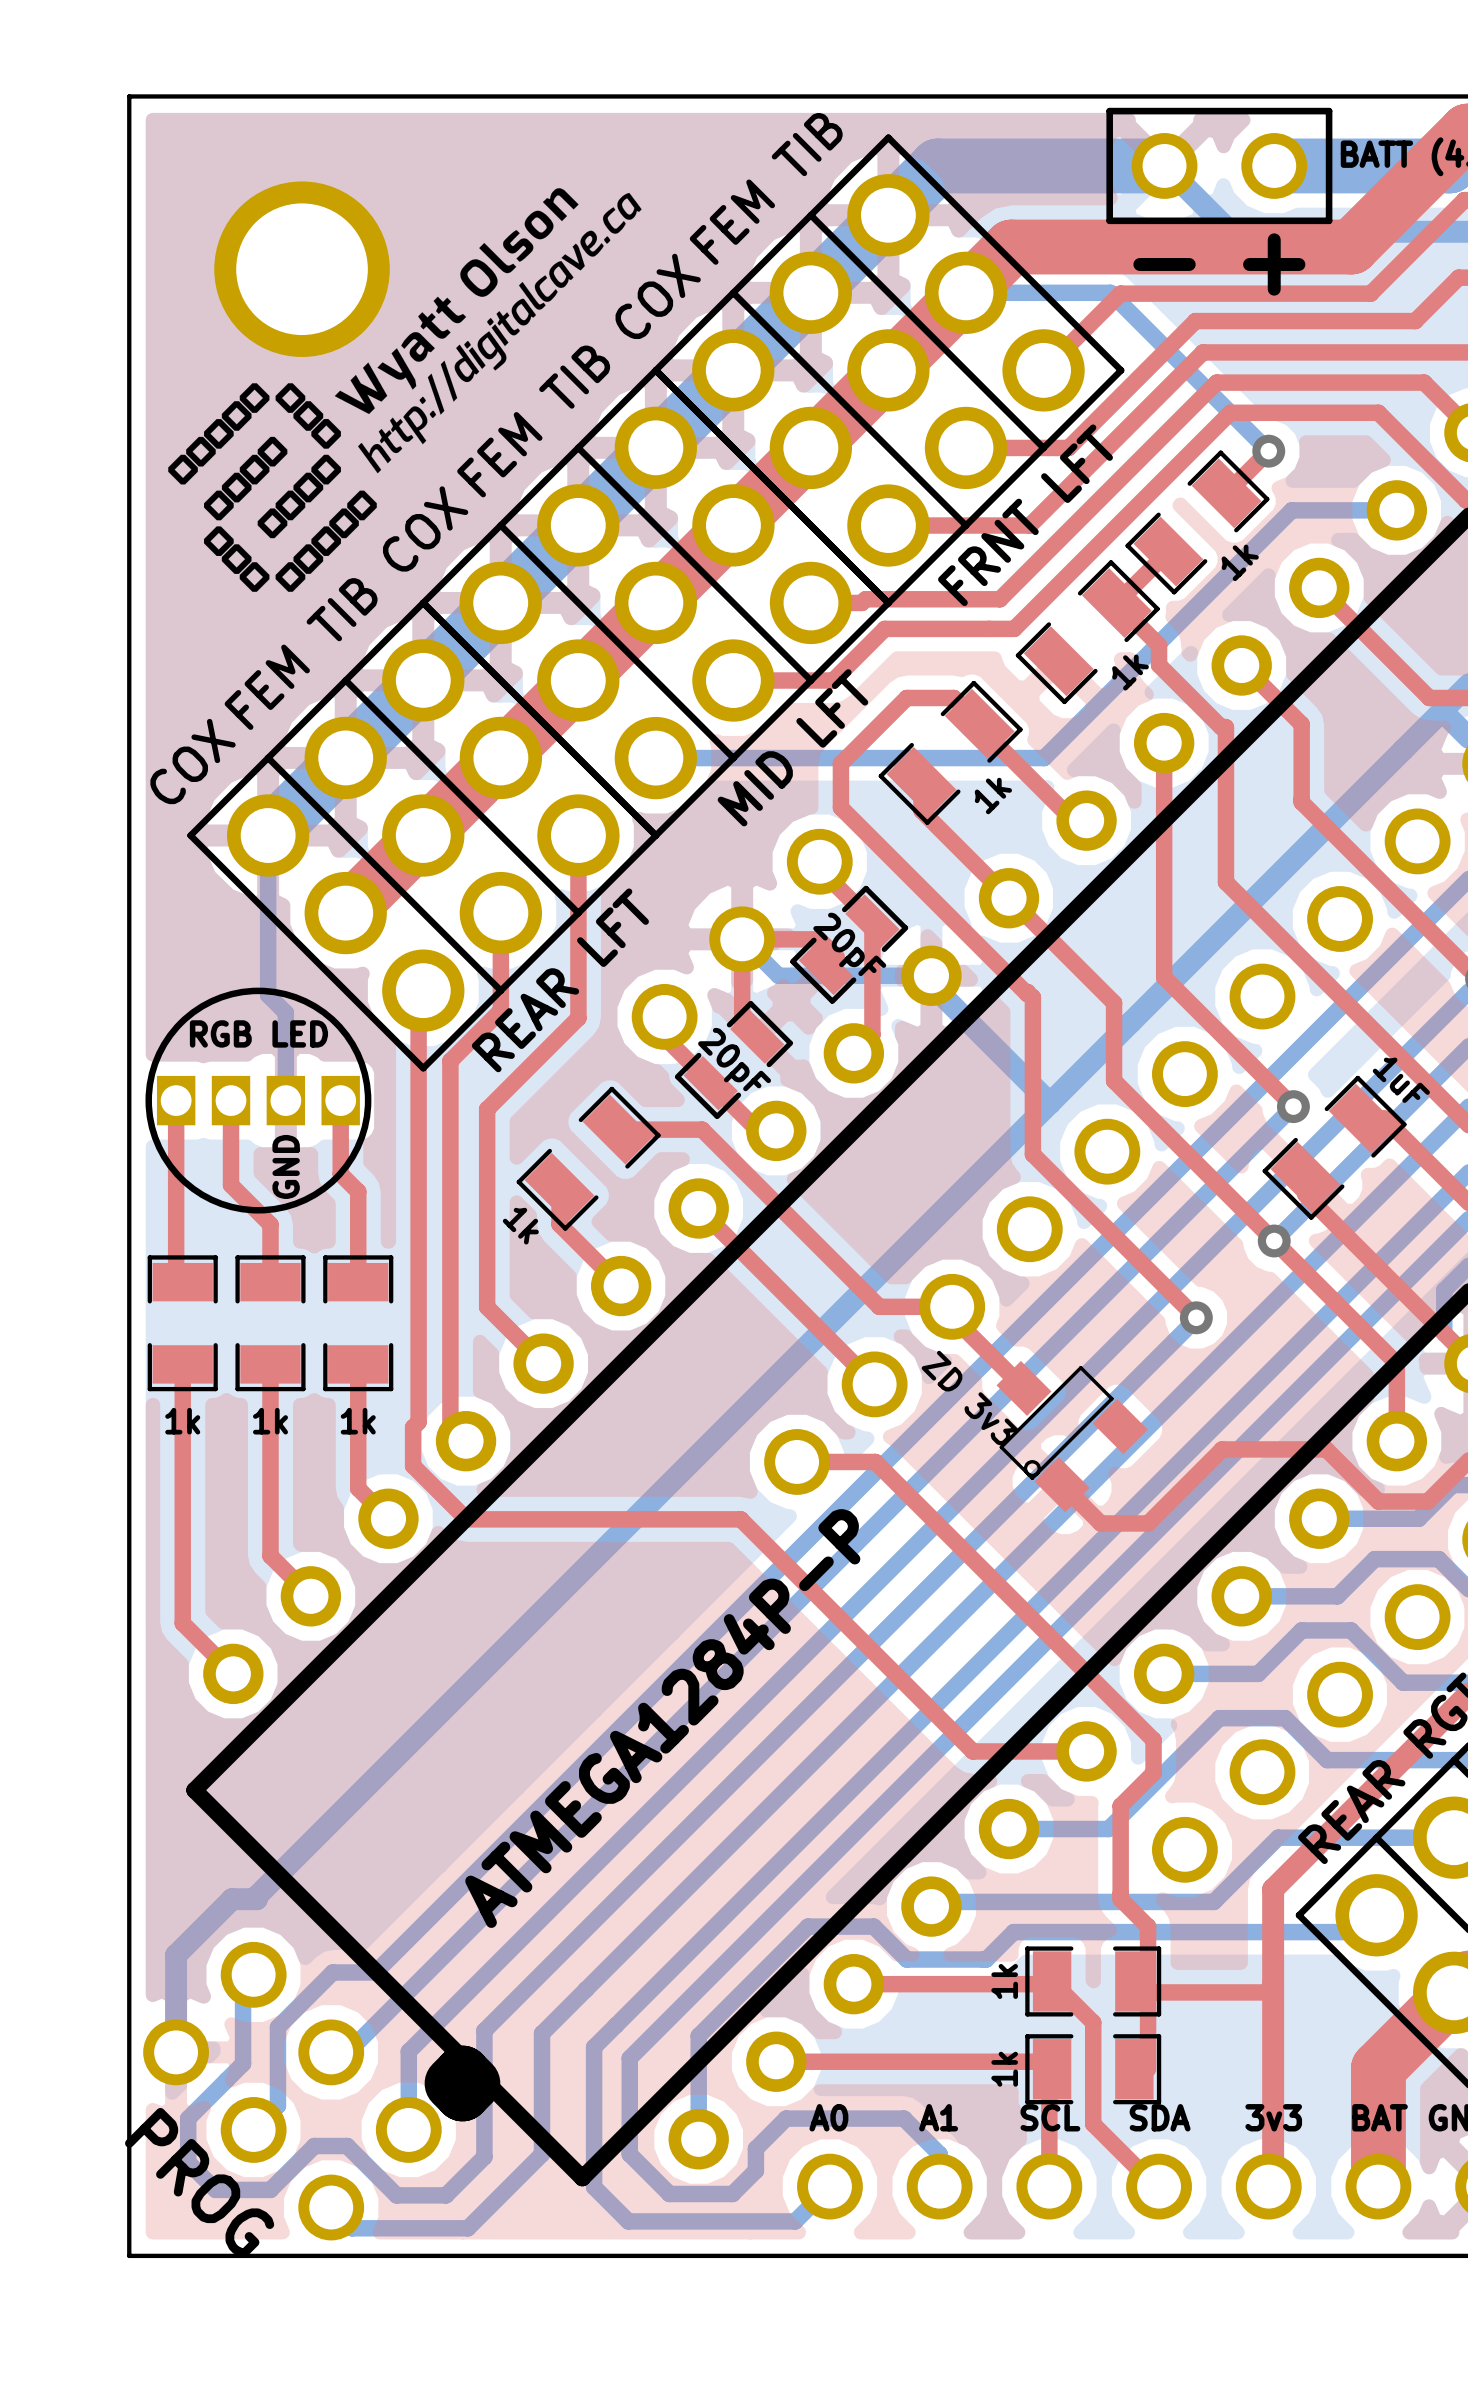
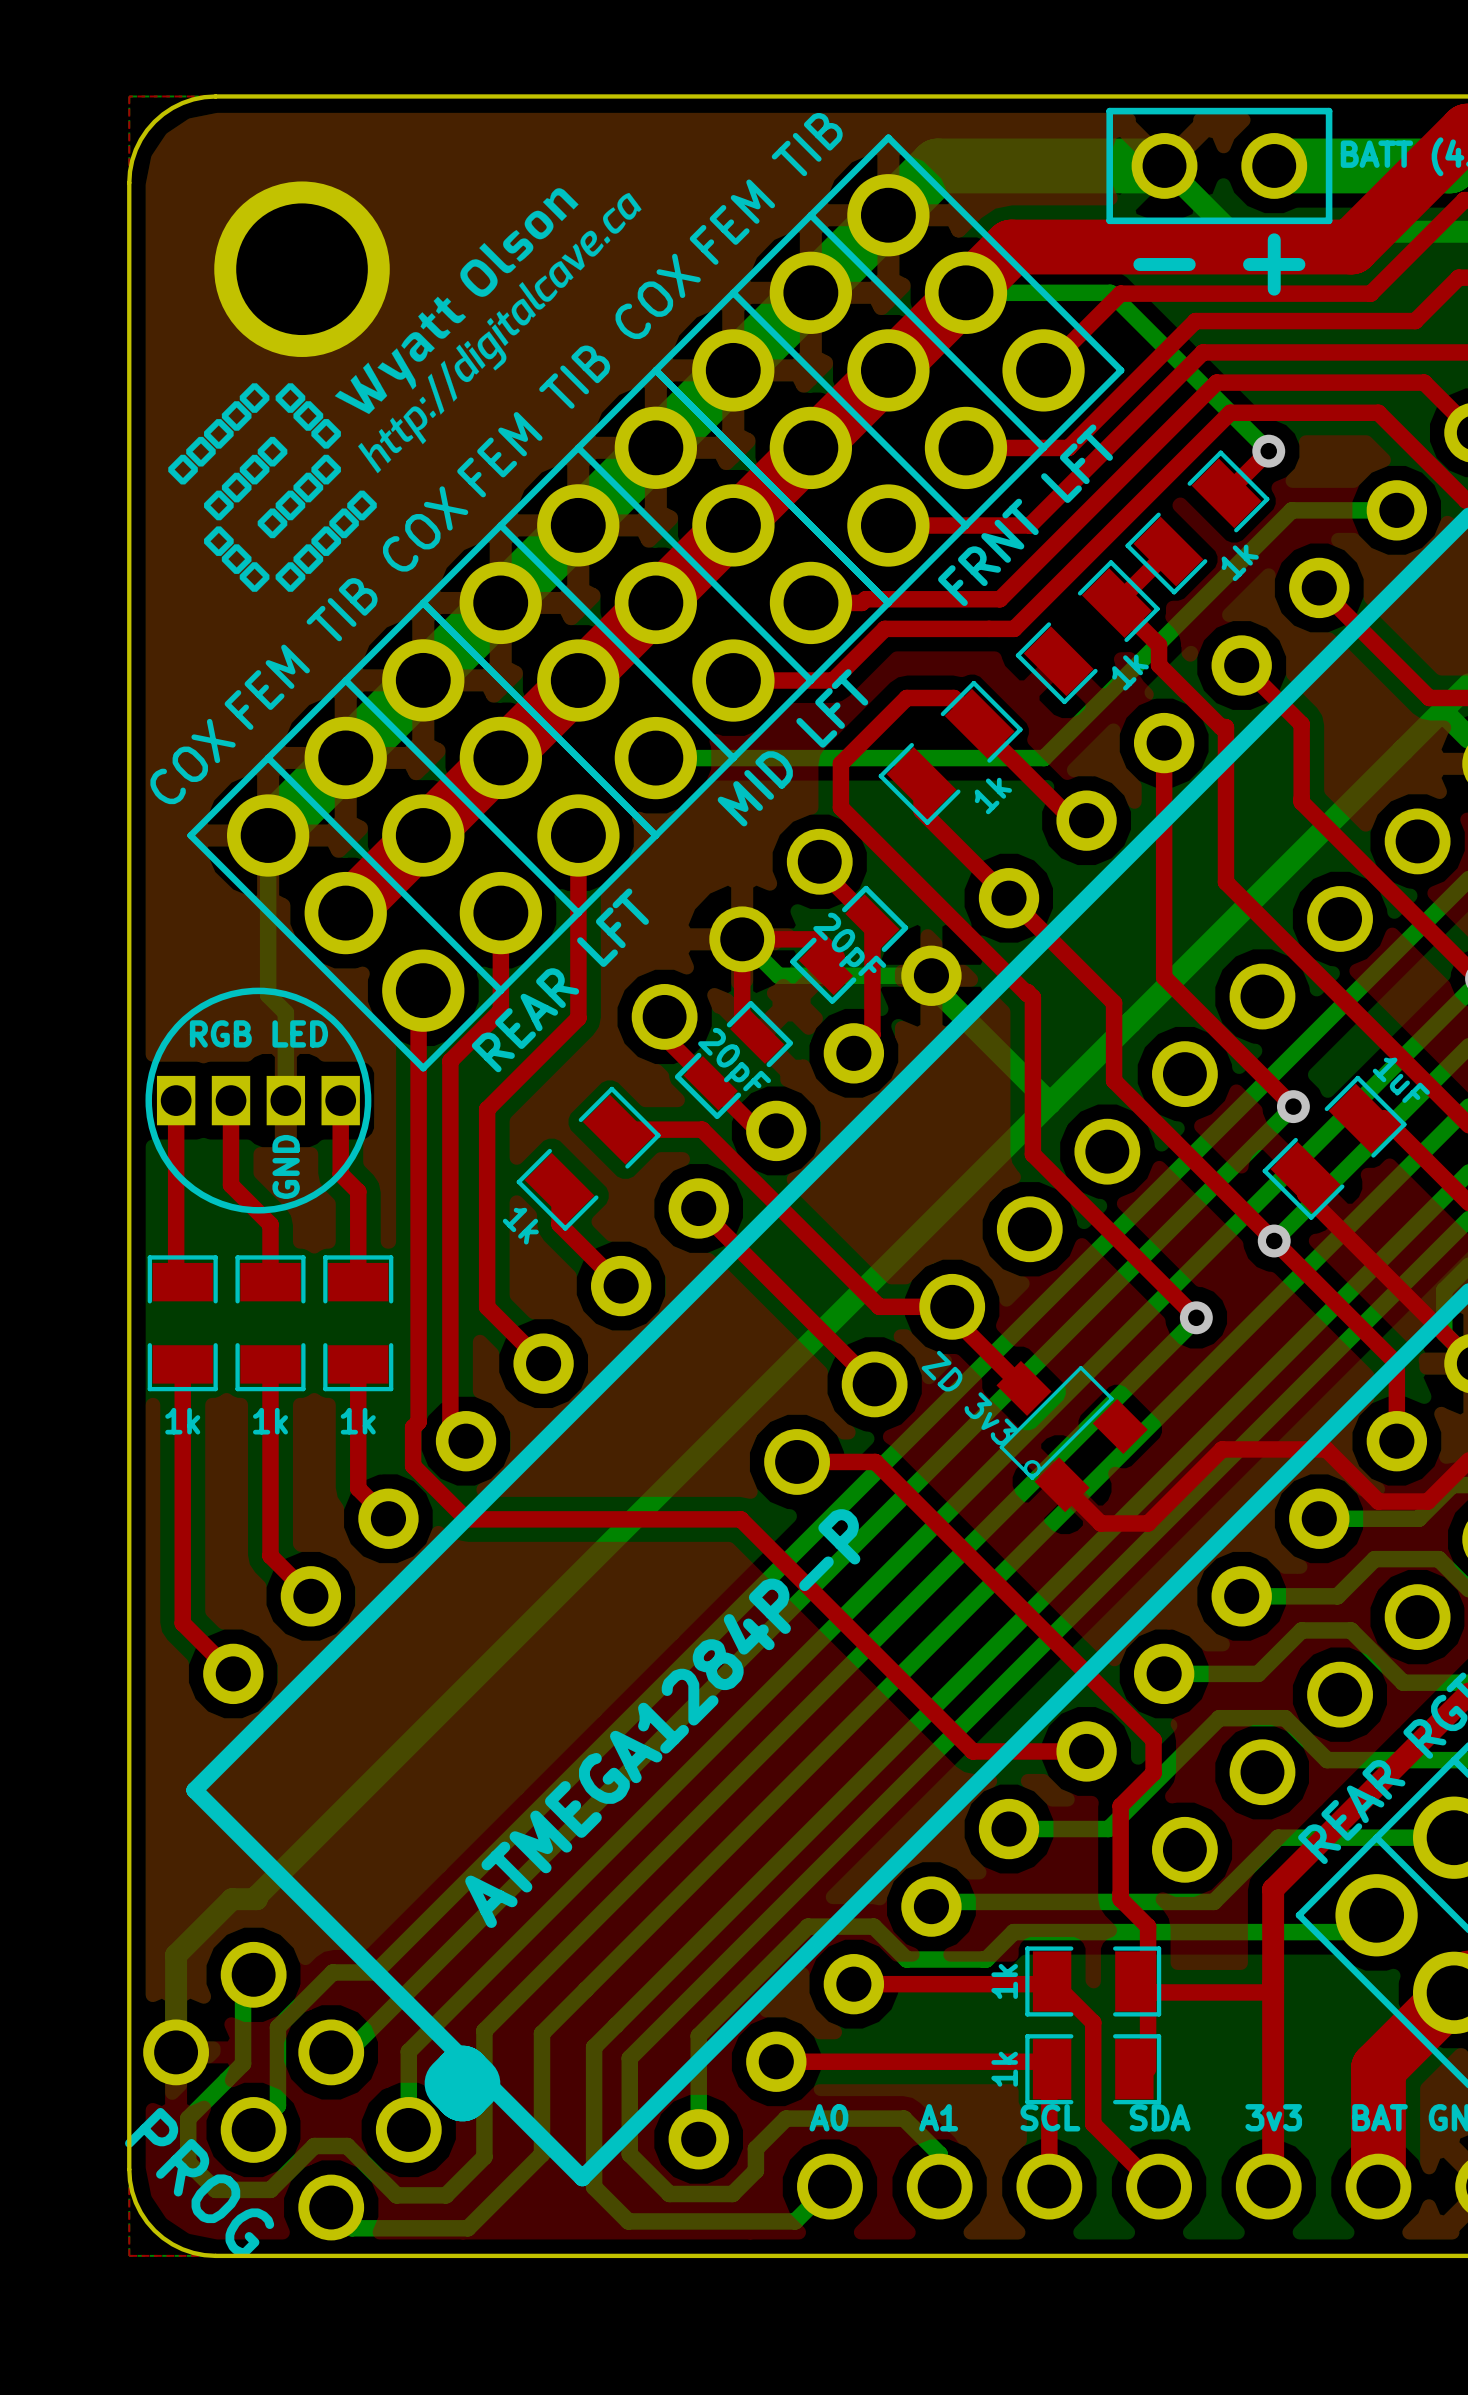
board edge: (215, 96) (129, 96) (129, 182) -> (215, 96) (182, 103) (154, 121) (135, 149) (129, 182)
board edge: (129, 2169) (129, 2255) (215, 2255) -> (129, 2169) (135, 2202) (154, 2230) (182, 2249) (215, 2255)

